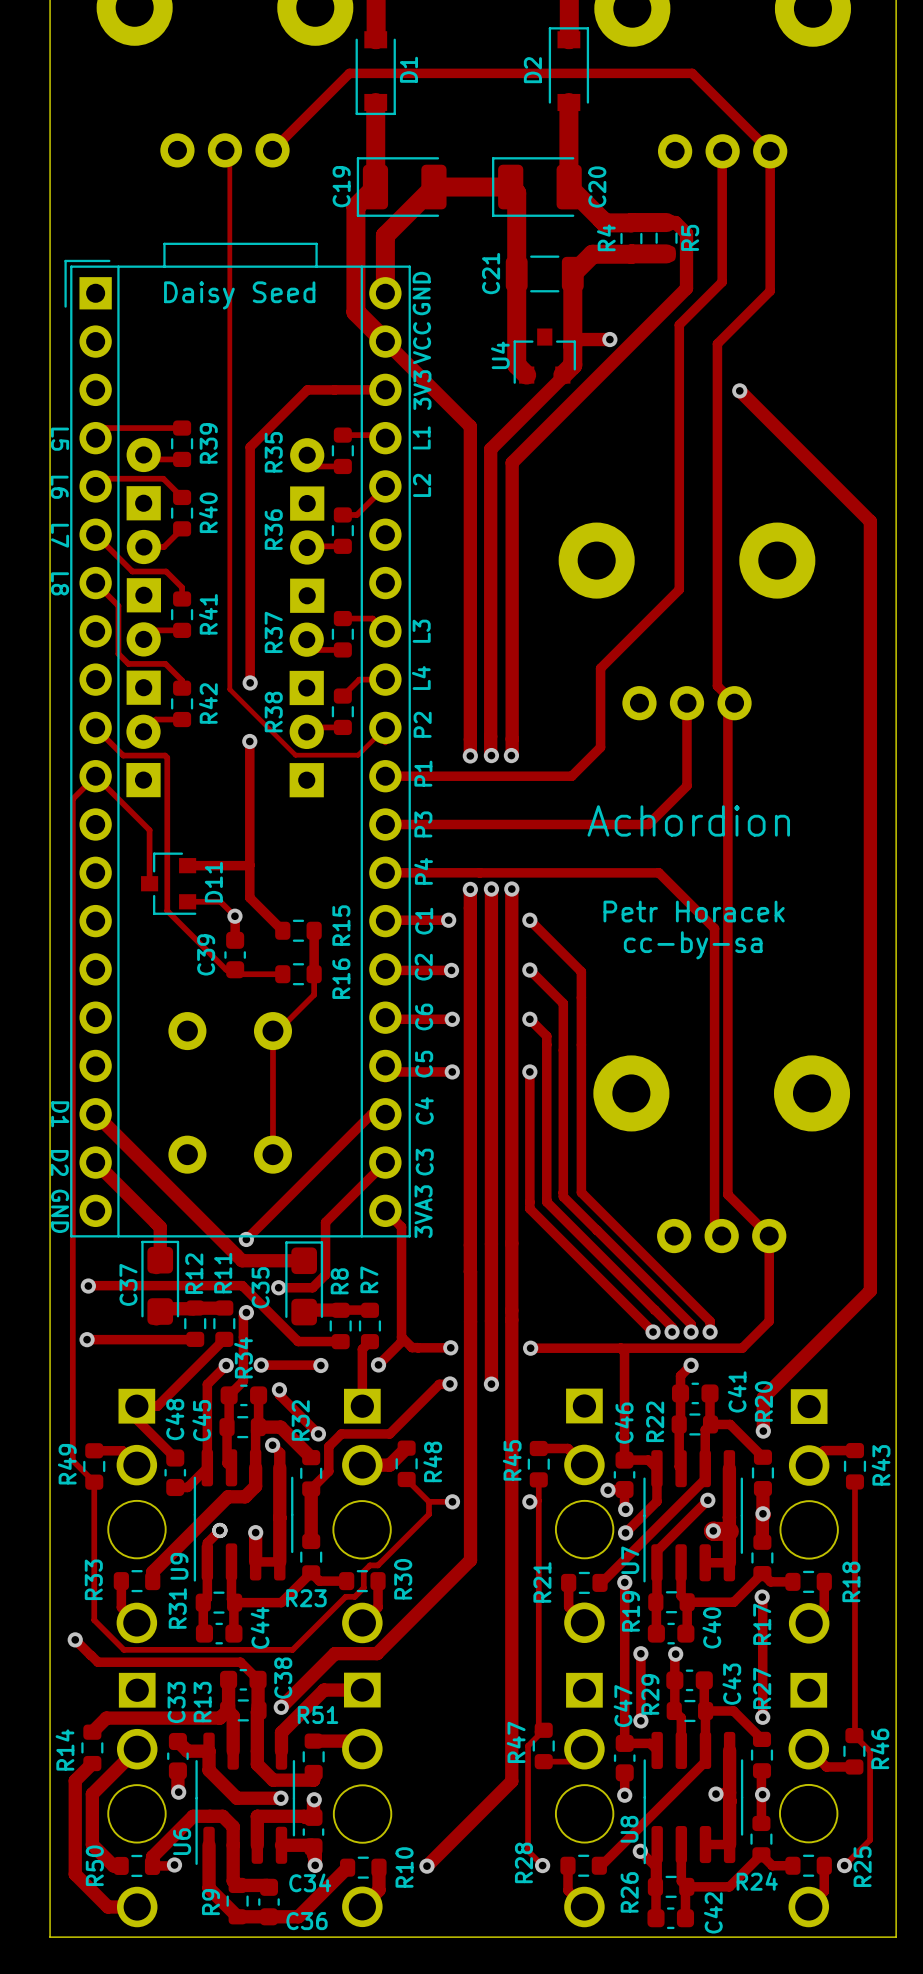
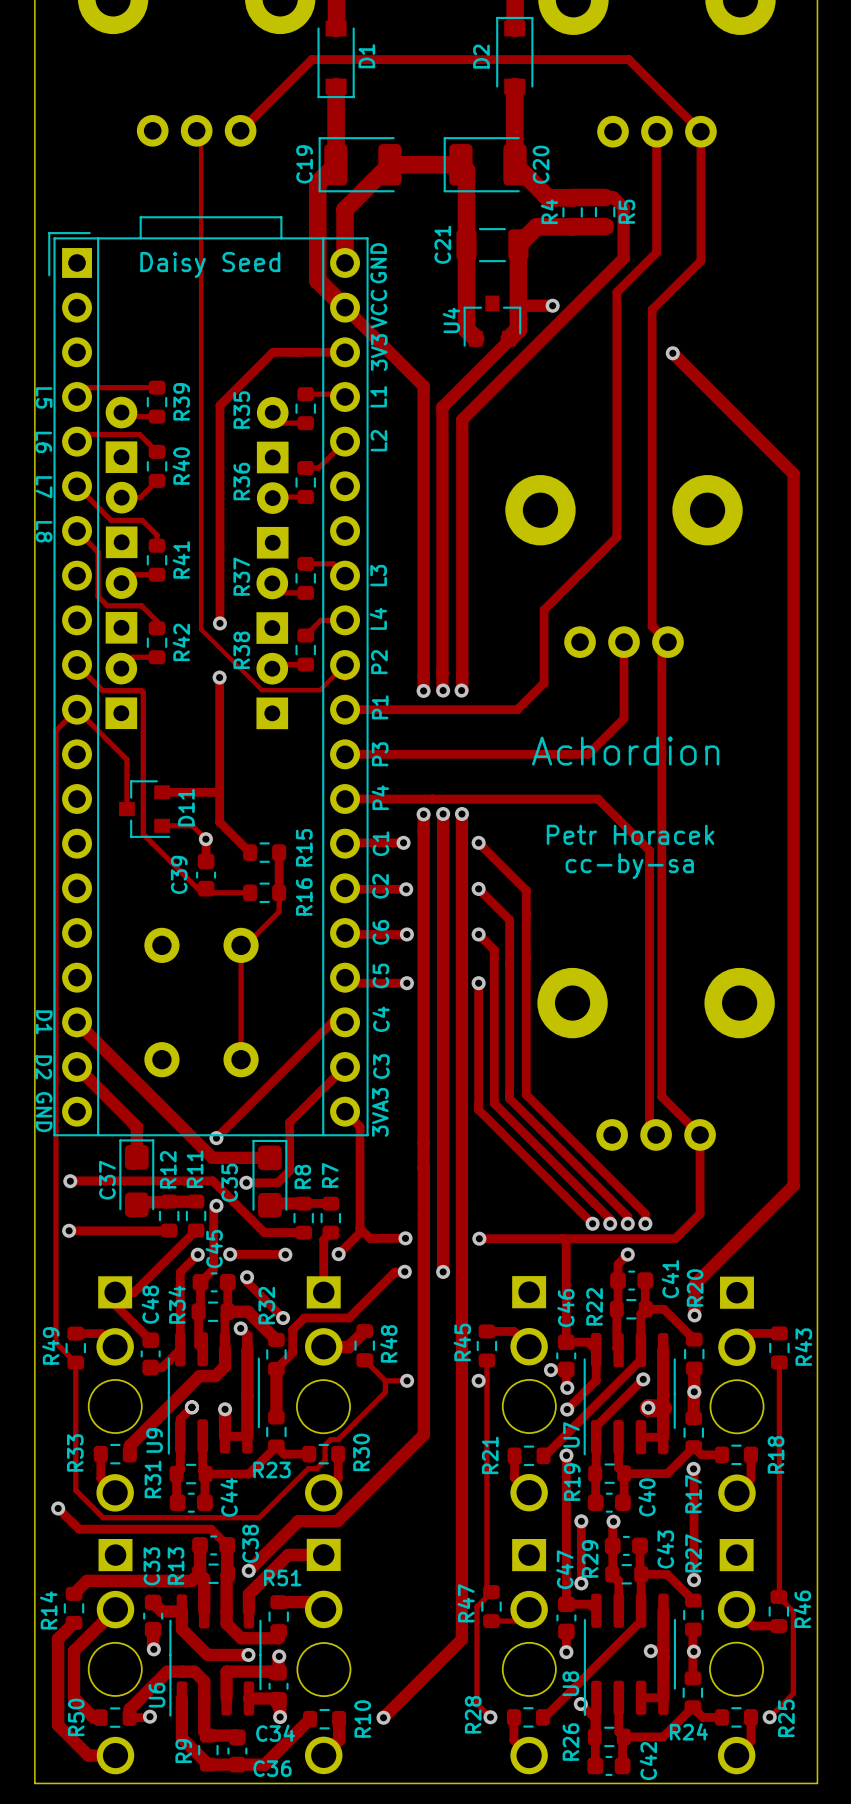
R34 name position: R34 (243, 1357) -> R34 (177, 1304)
C45 name position: C45 (201, 1420) -> C45 (214, 1249)

